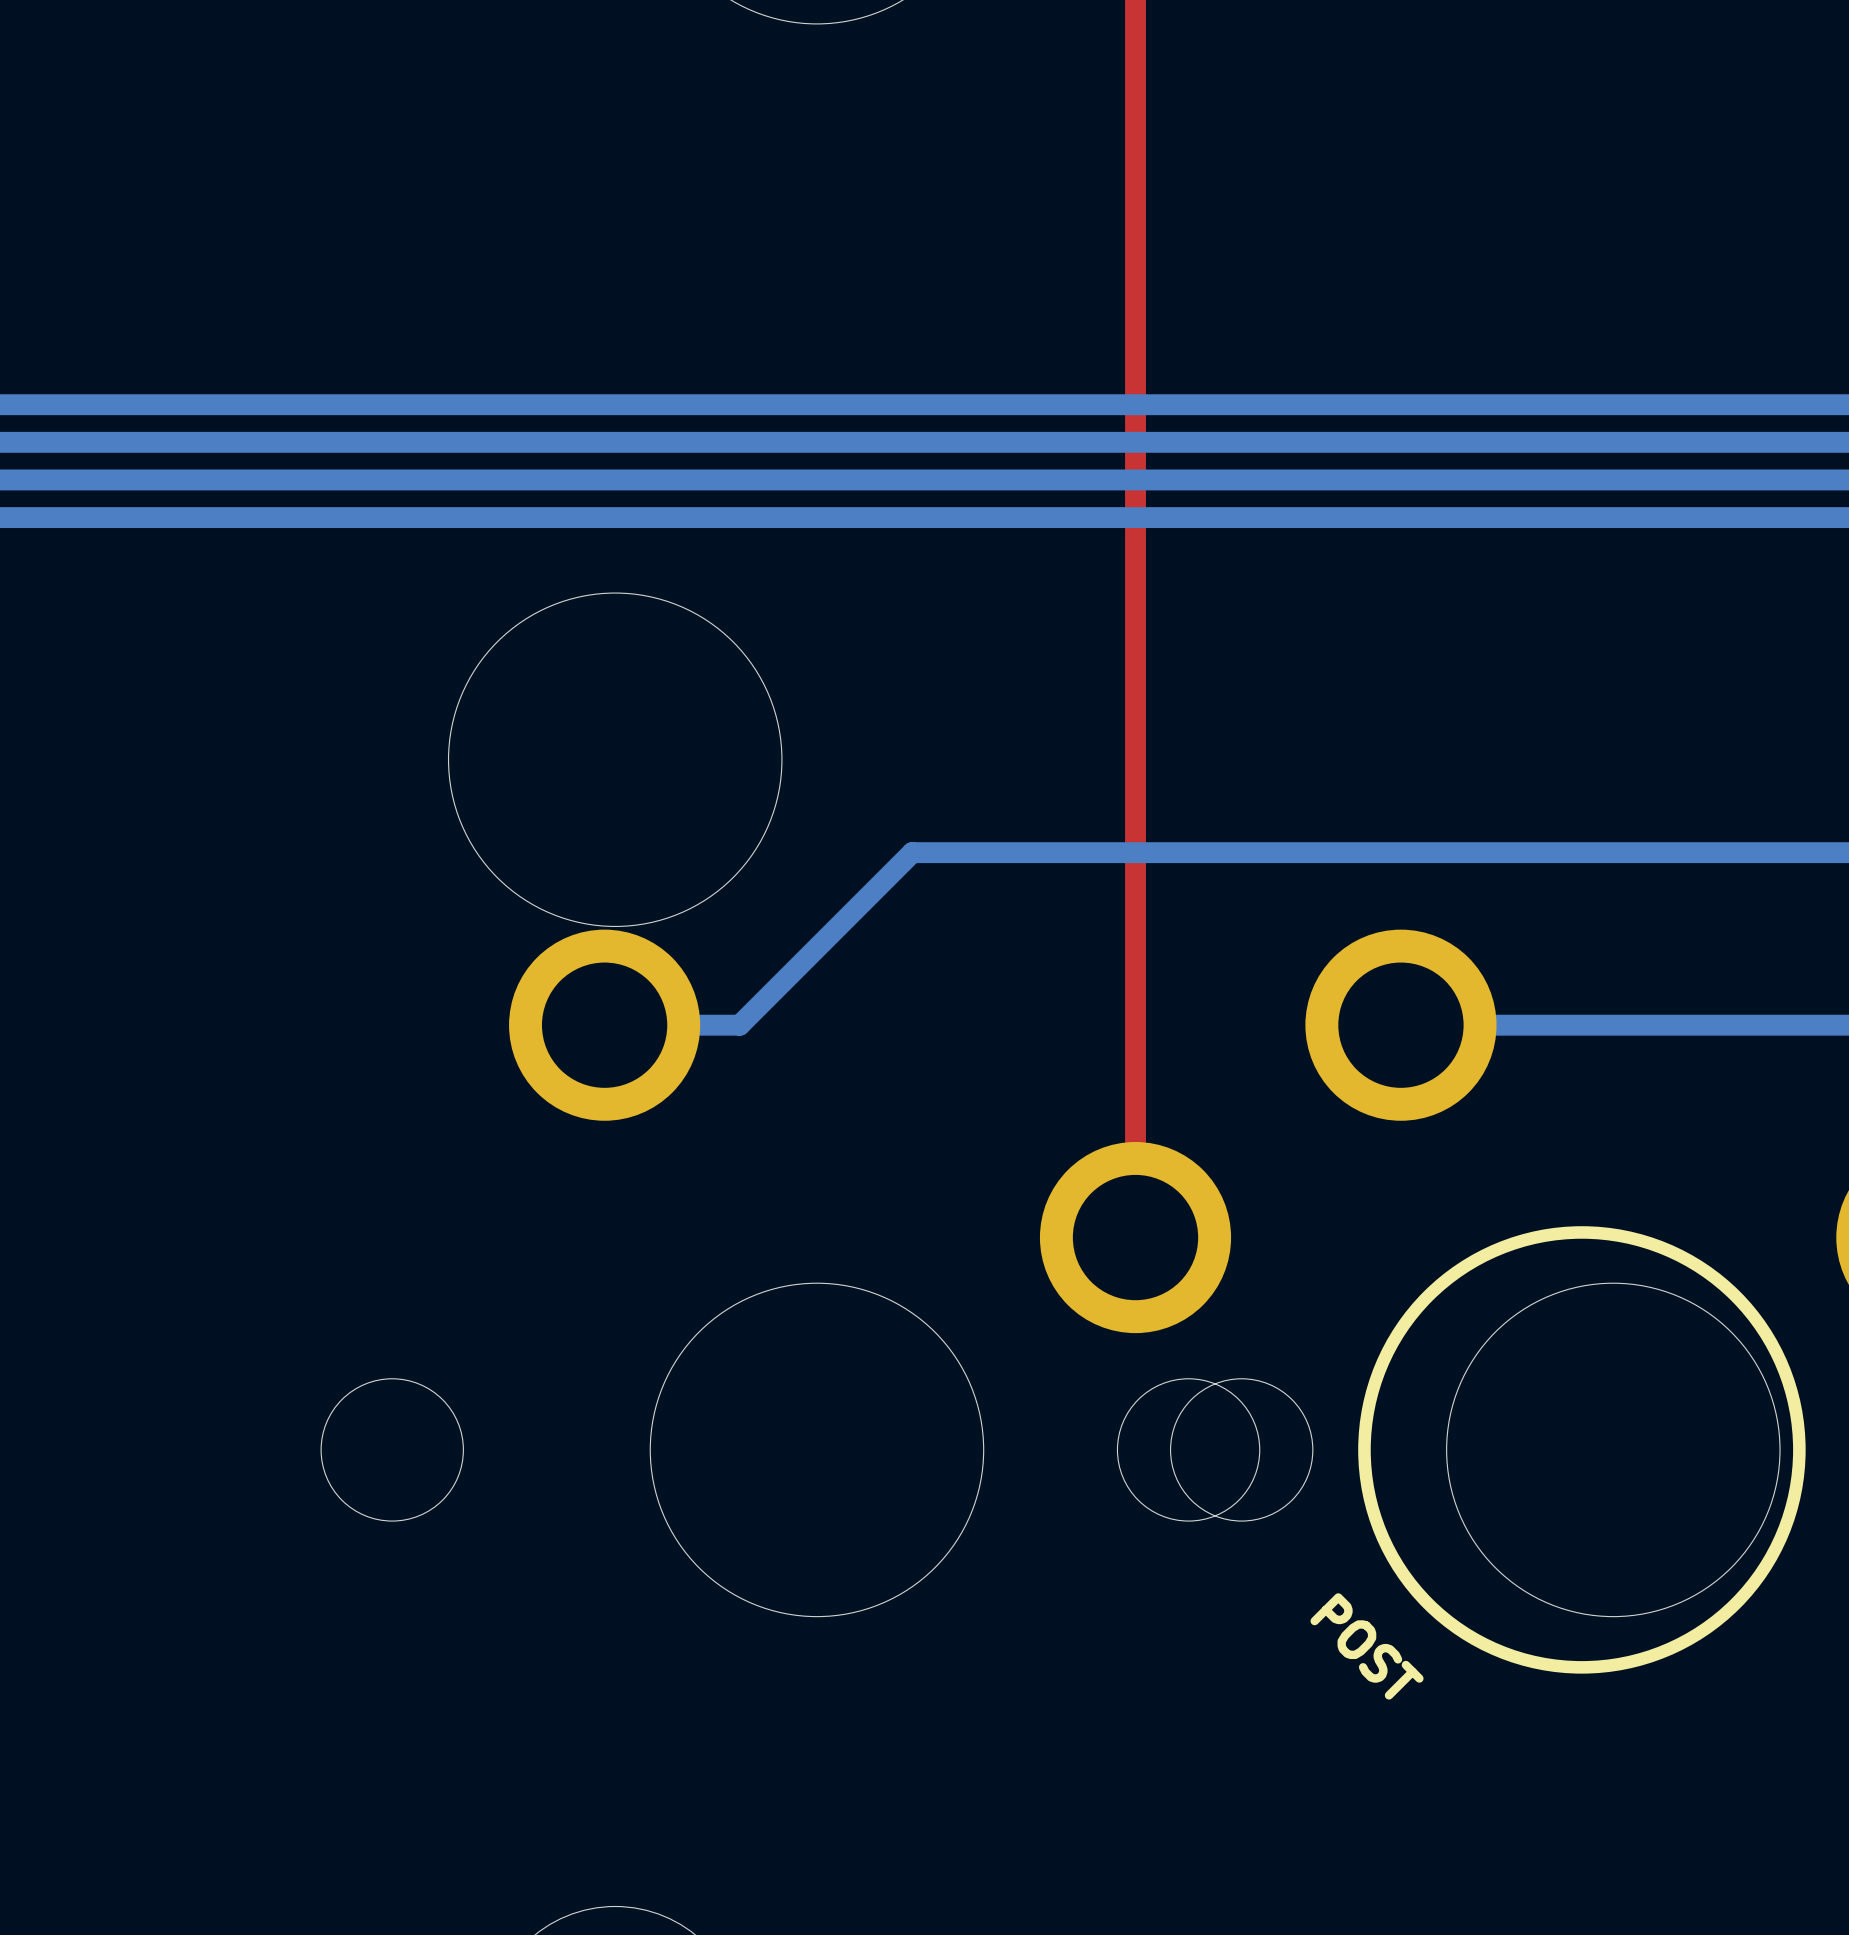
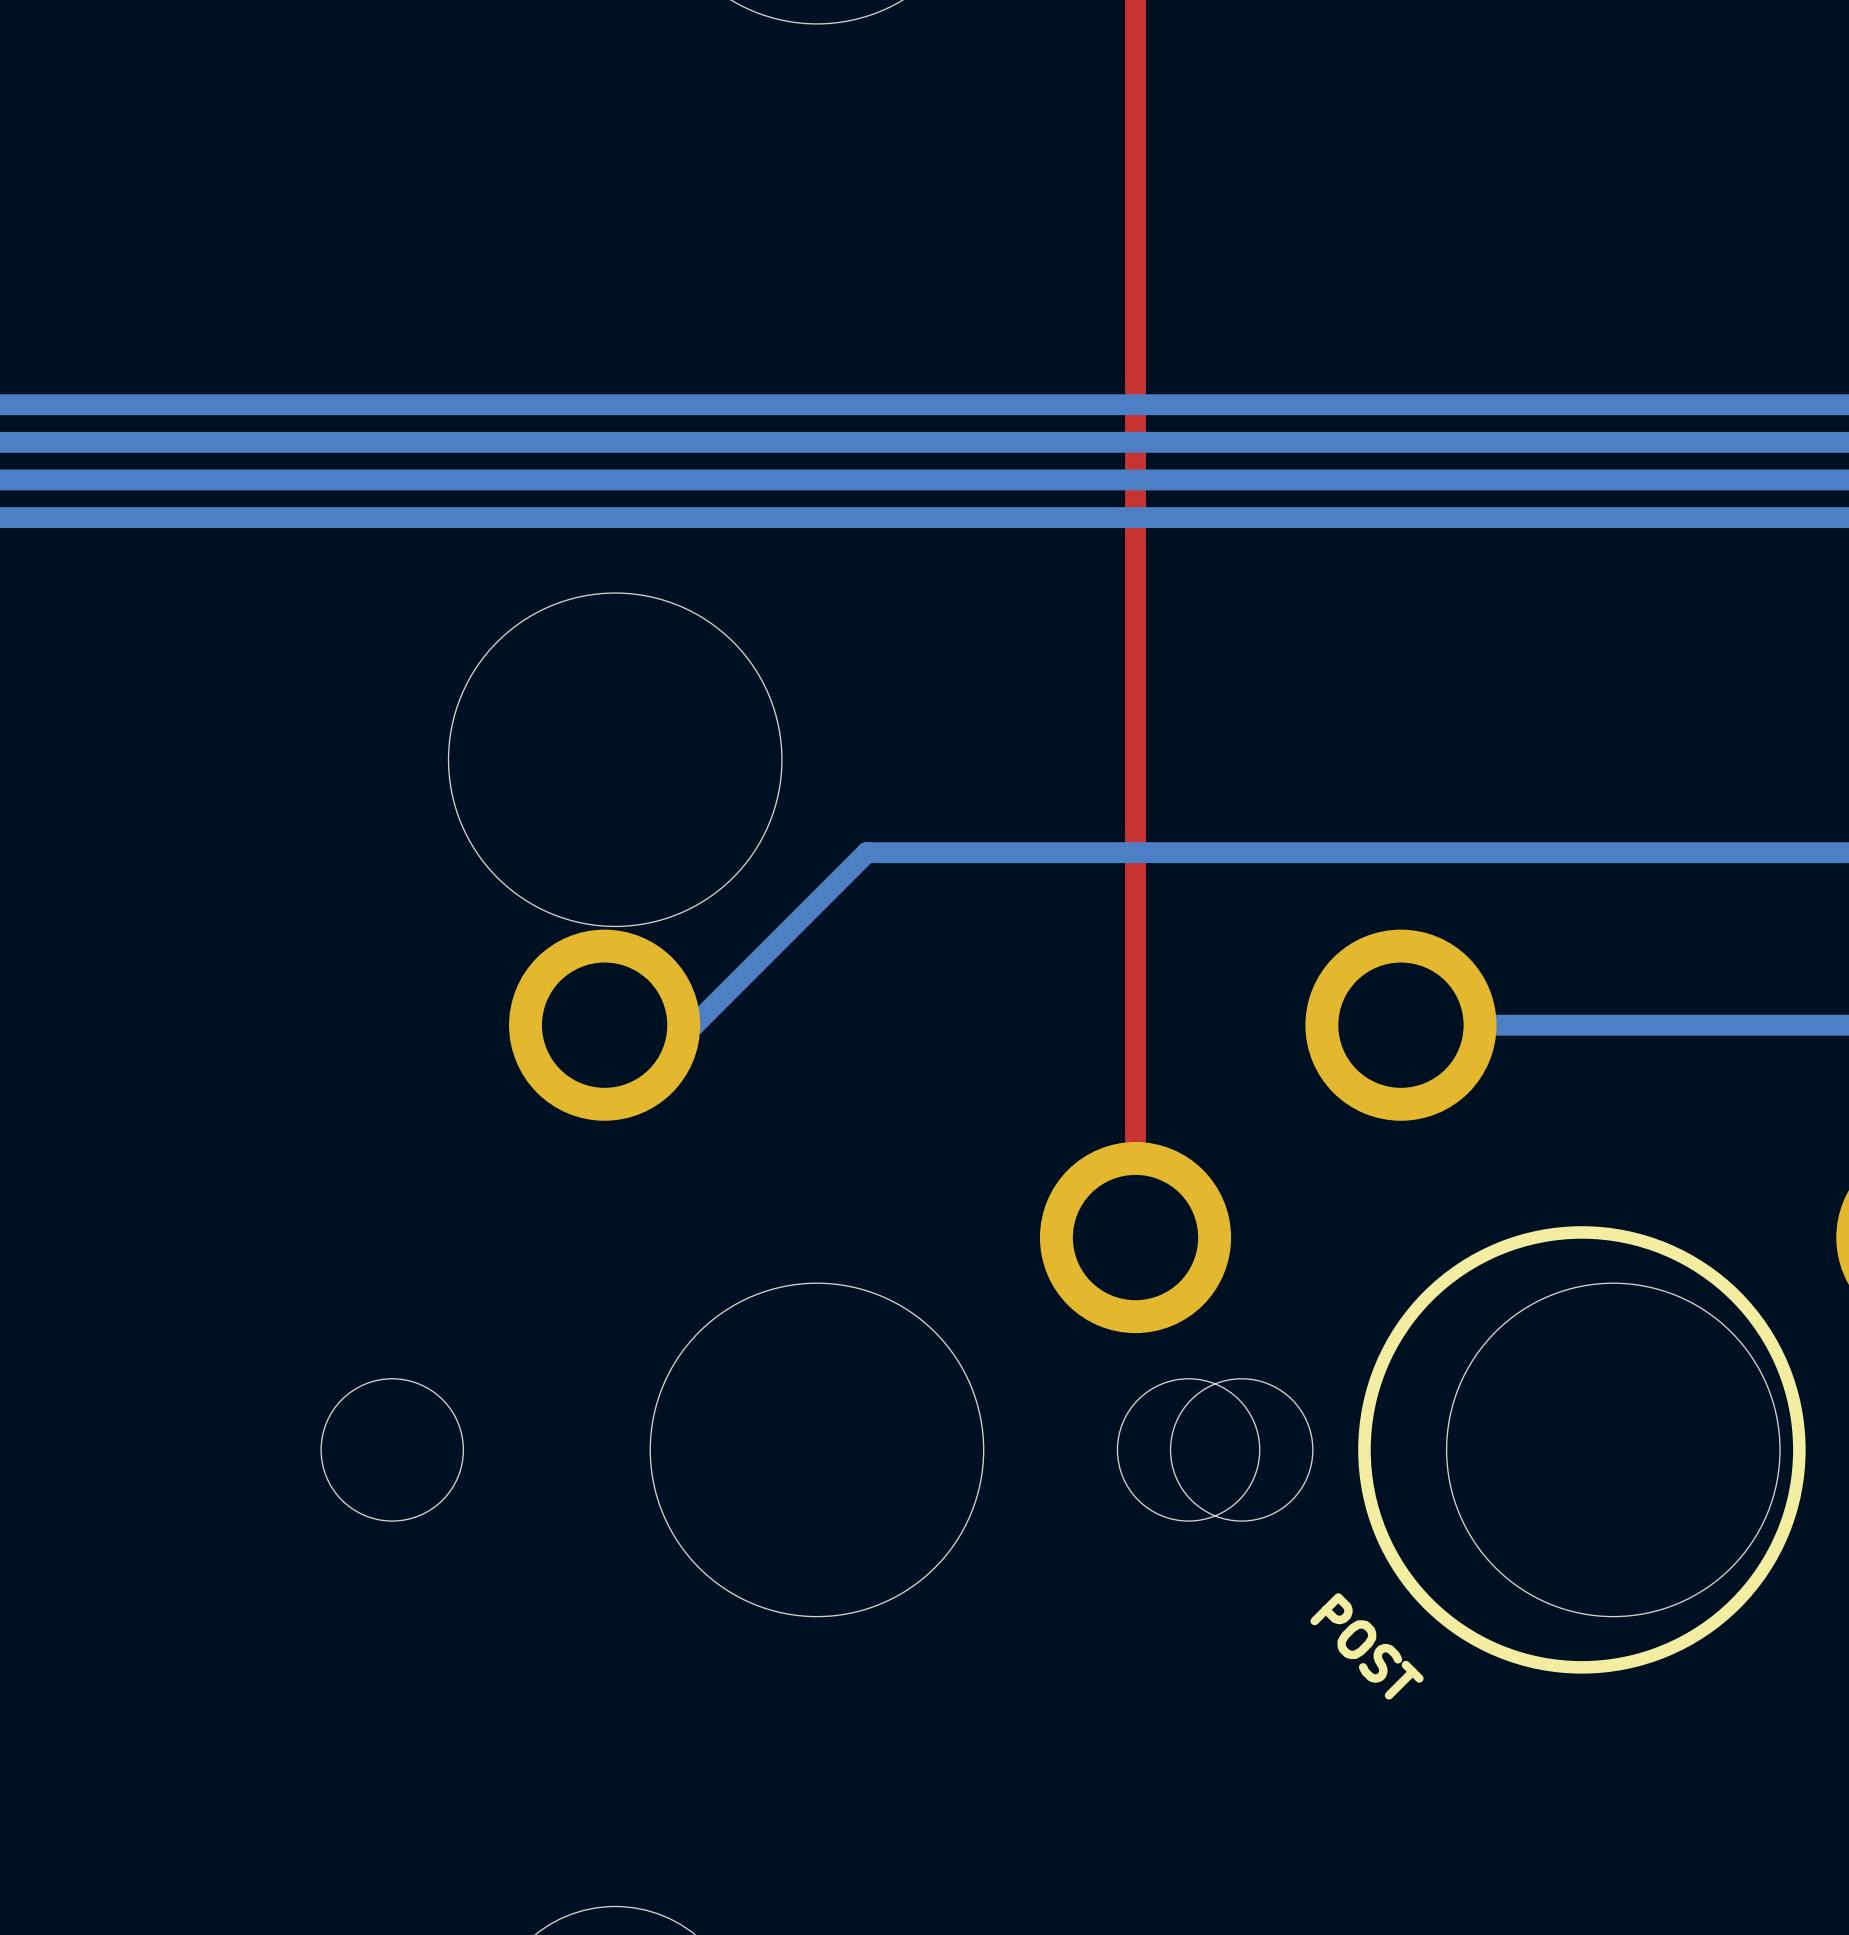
bottom track: (912, 852) (739, 1025) (694, 1025) -> (912, 852) (866, 852) (694, 1025)

